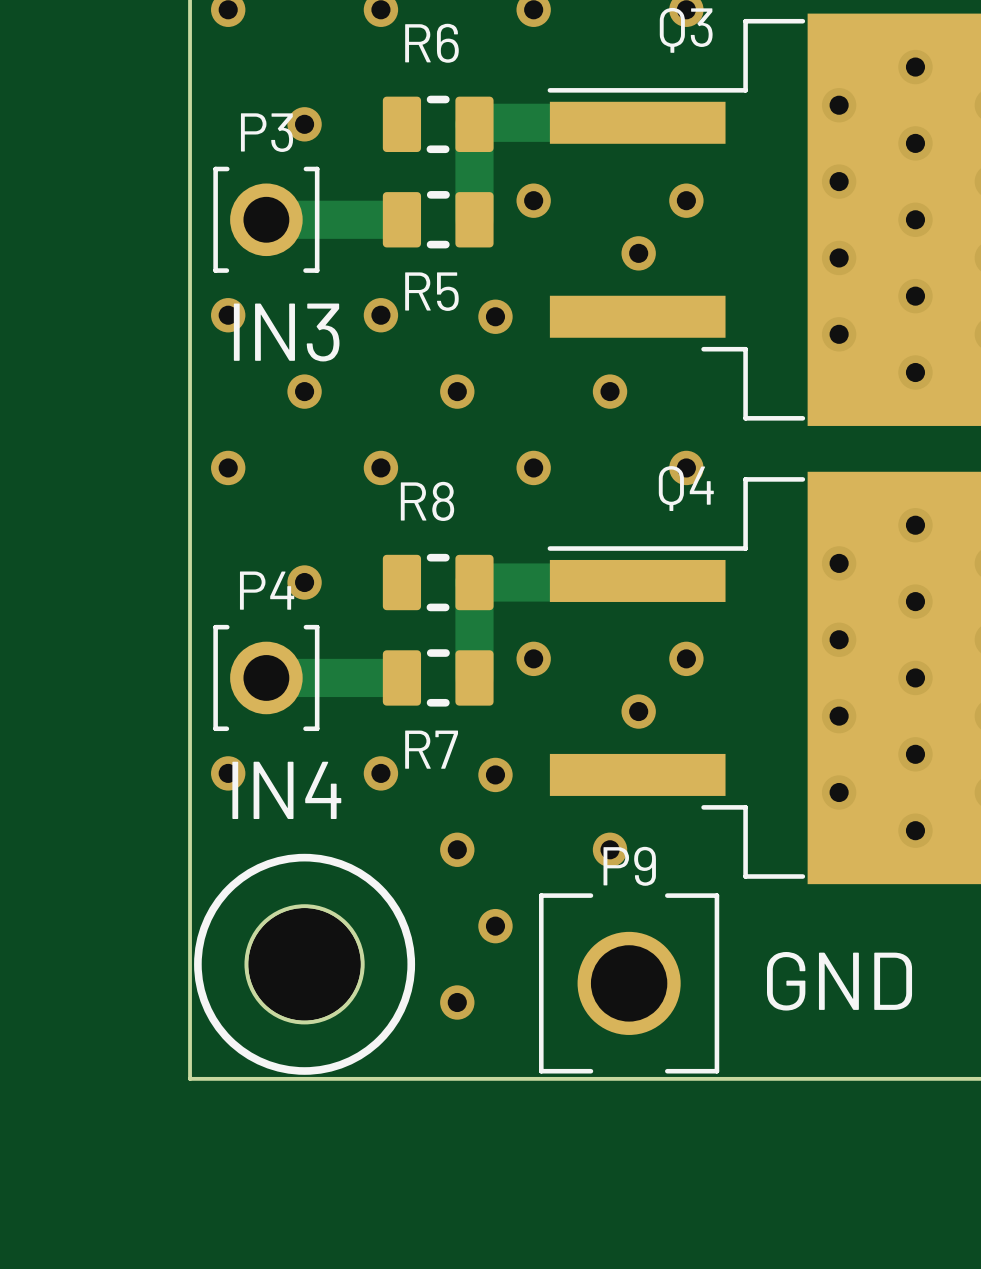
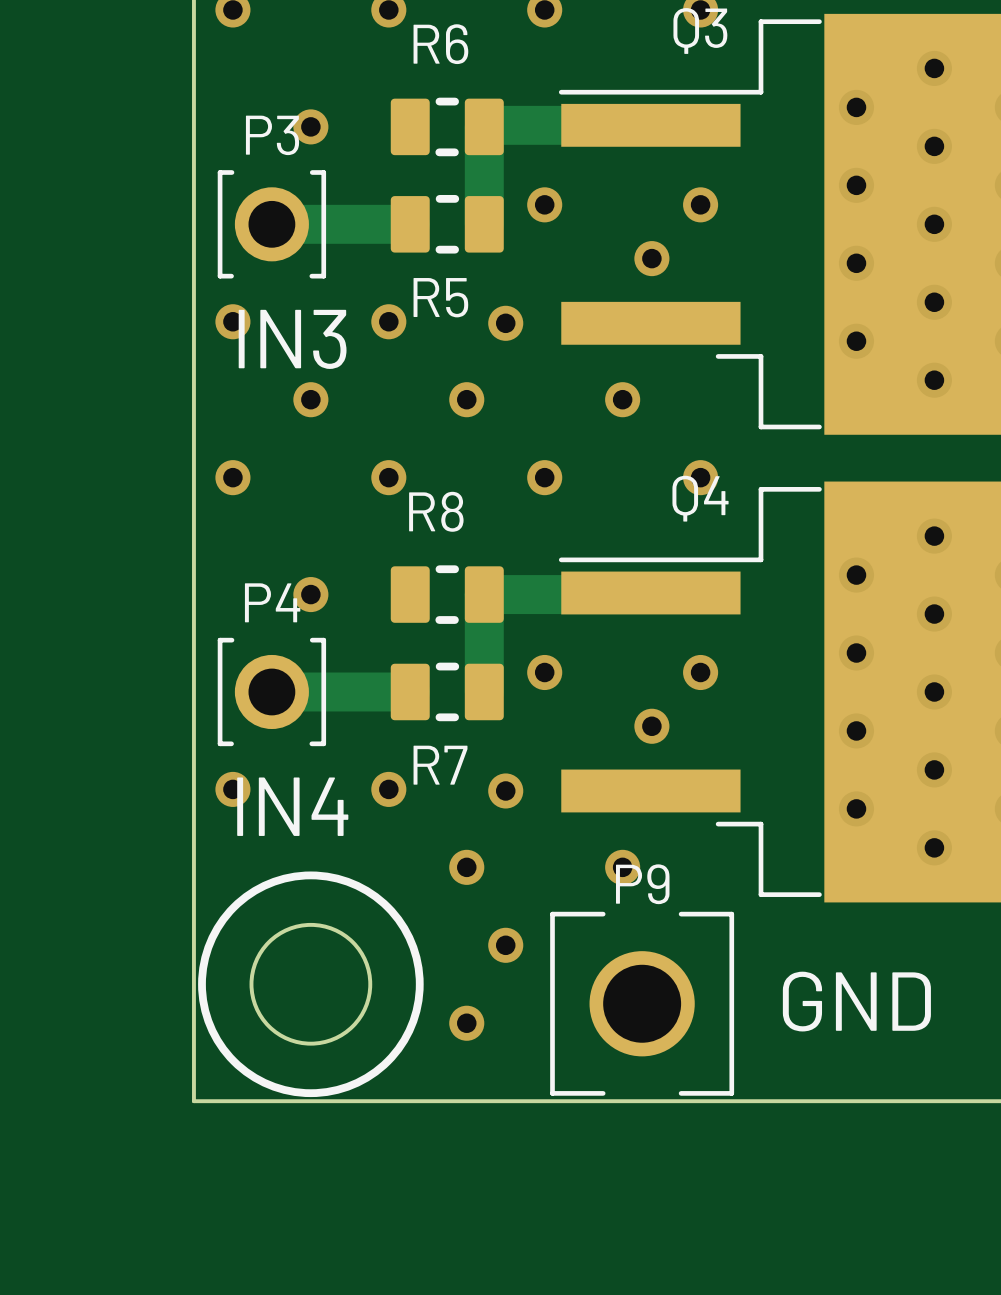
part: (304, 964) -> none

